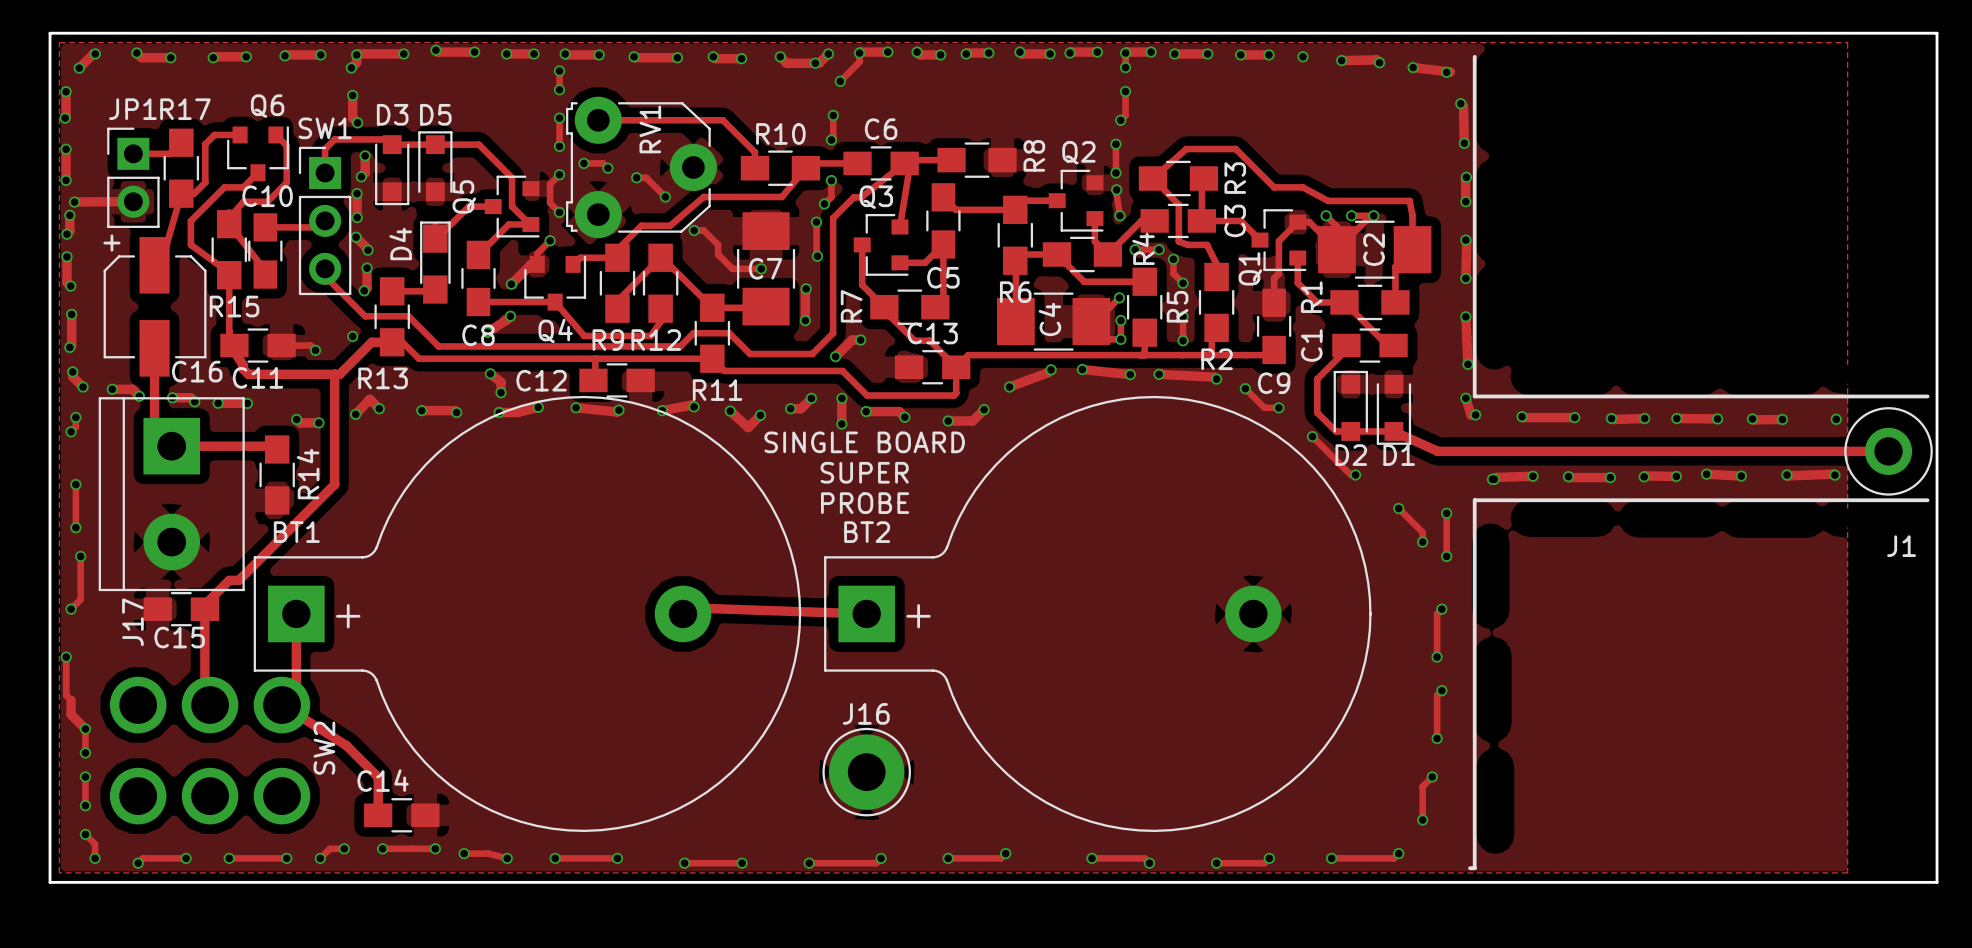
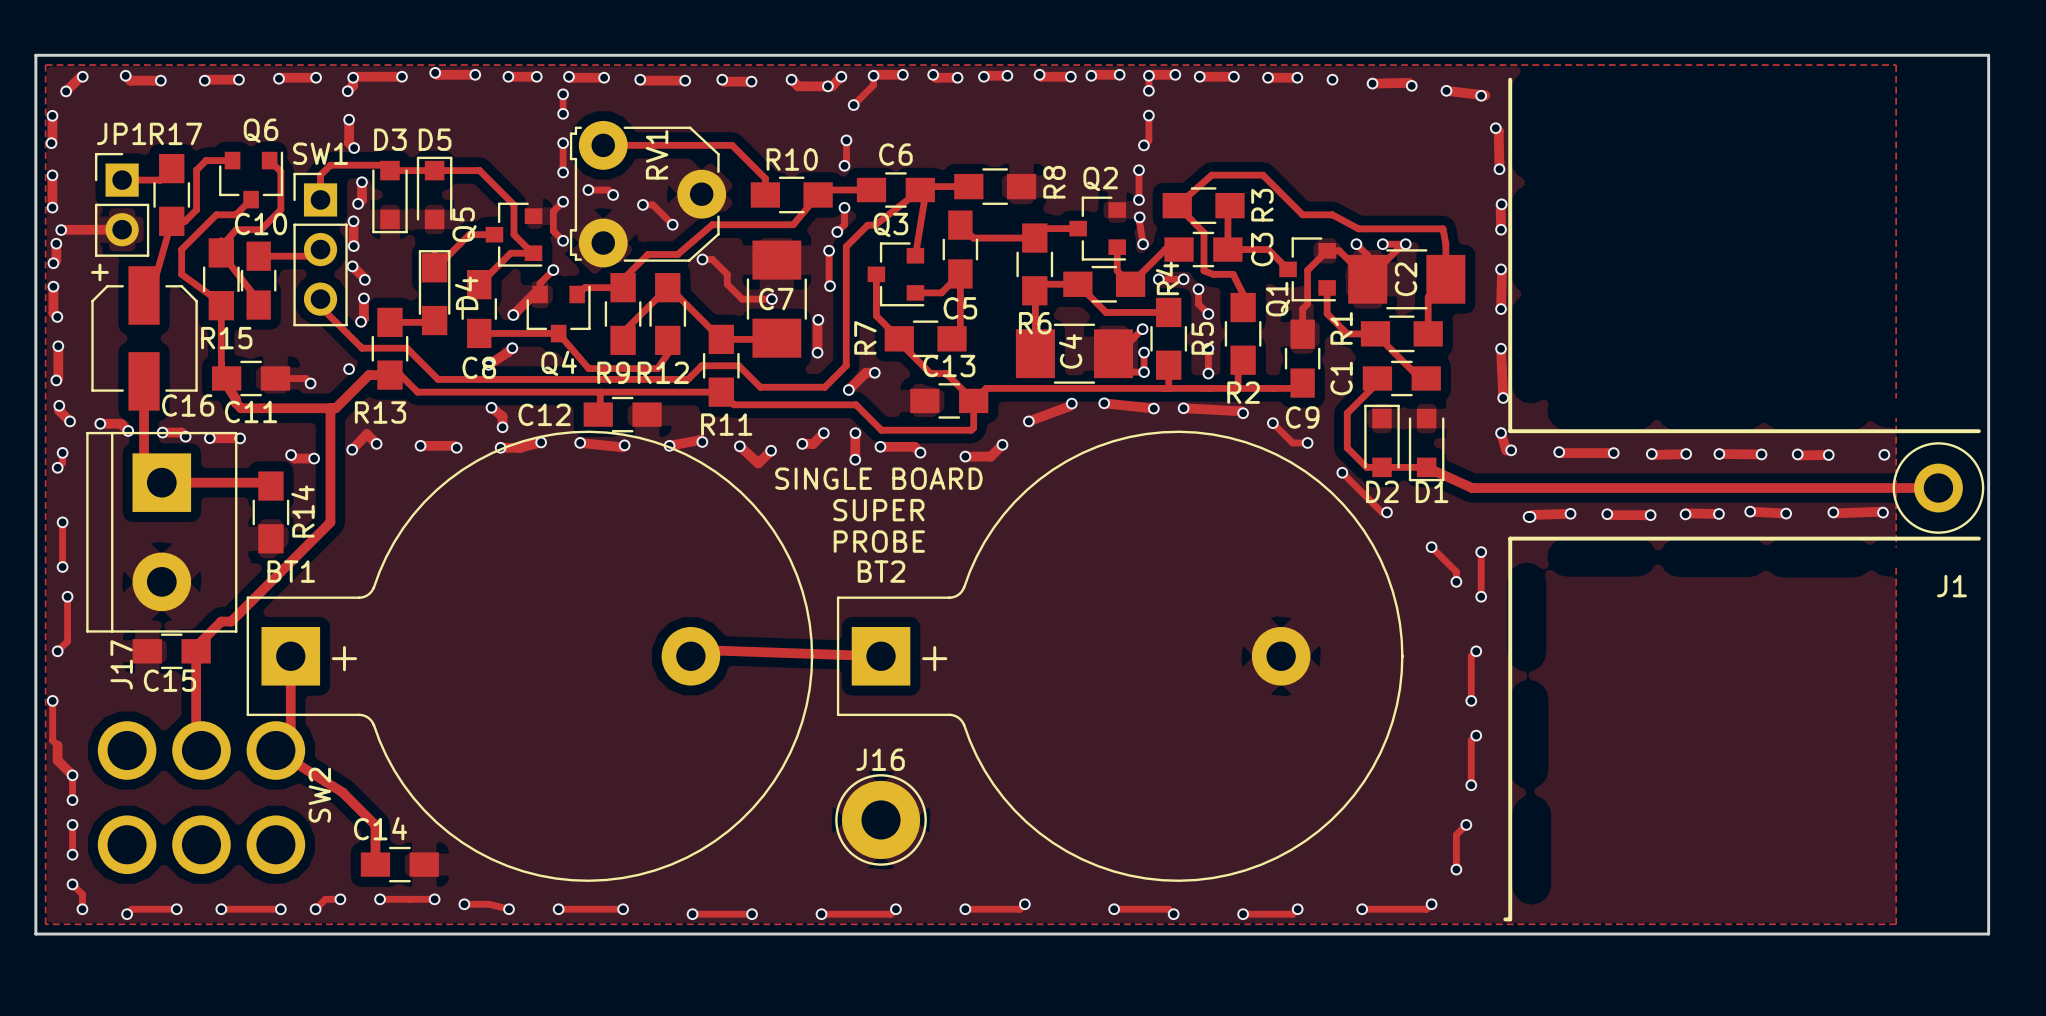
D4 name position: D4 (400, 244) -> D4 (466, 293)

